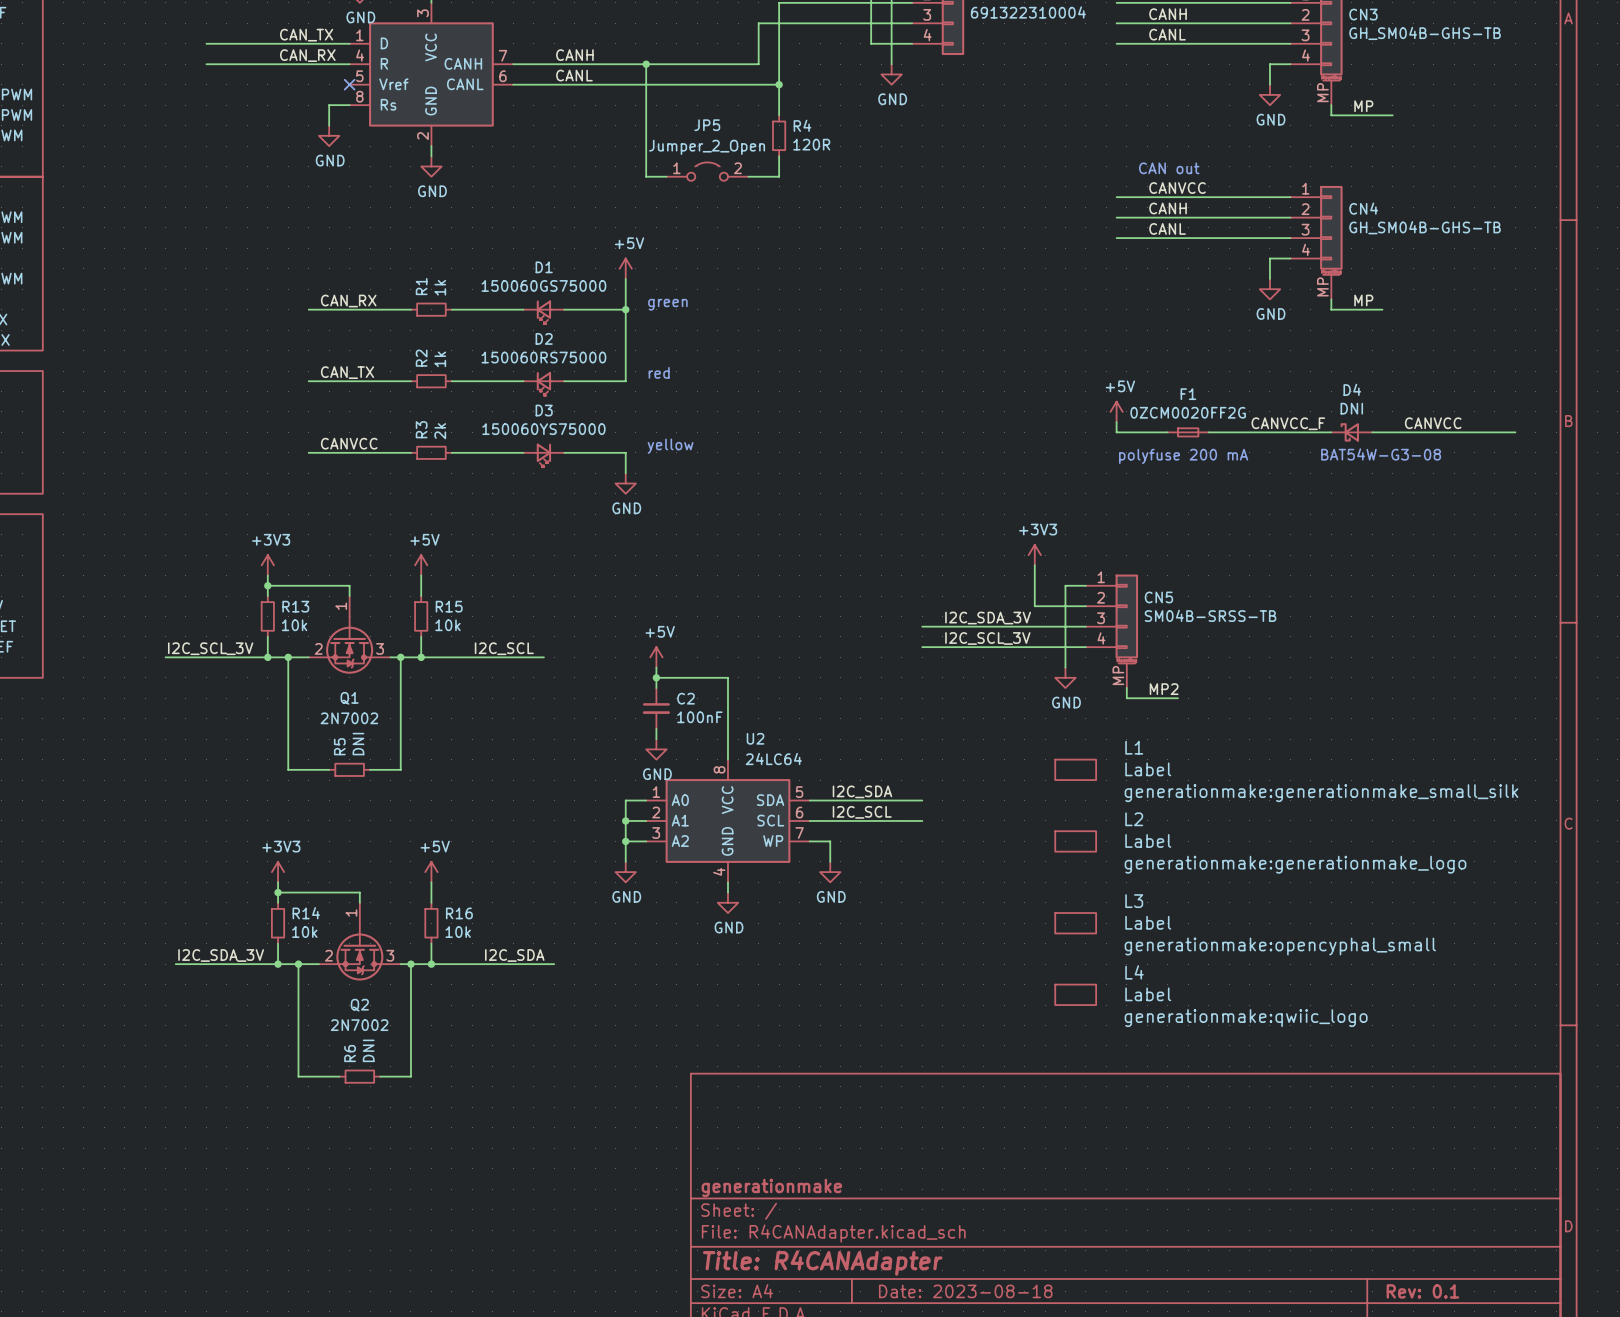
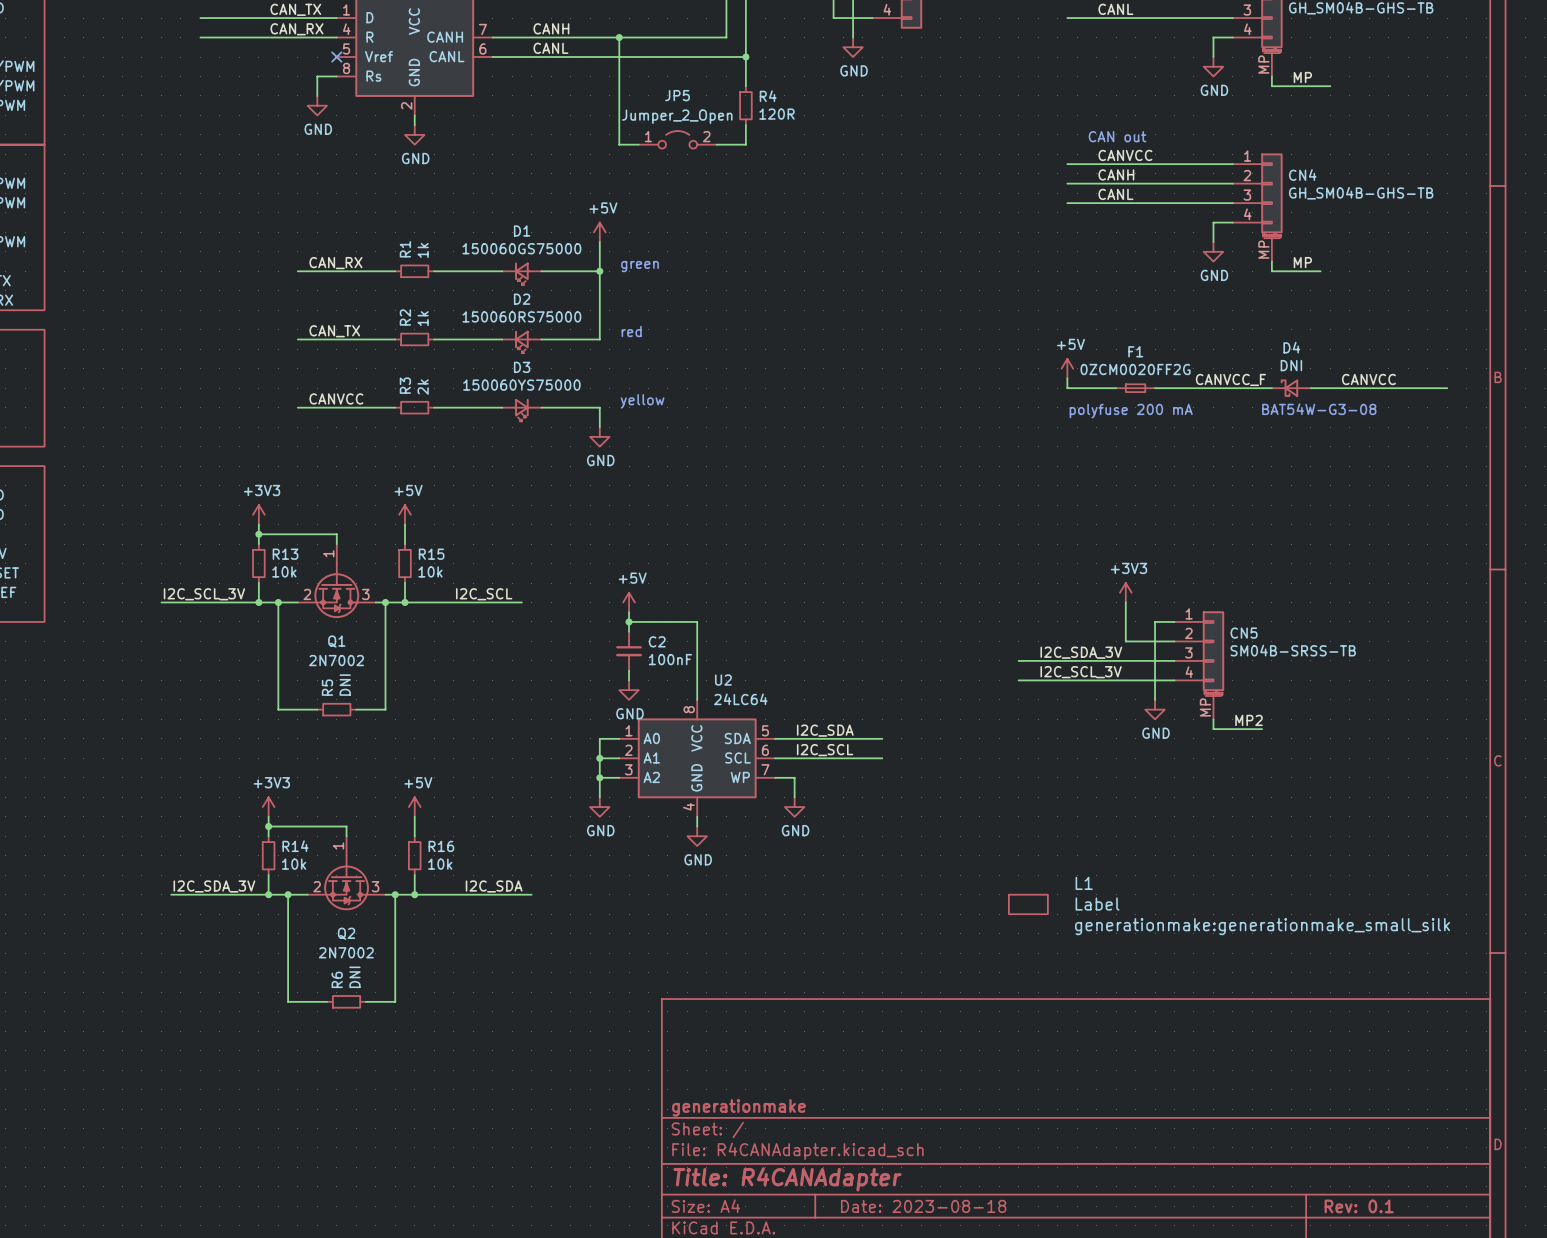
power symbol position: +3V3 (1034, 555) -> +3V3 (1125, 592)
wire: (1034, 565) (1034, 606) (1085, 606) -> (1125, 602) (1125, 641) (1174, 641)
wire: (1085, 585) (1065, 585) (1065, 667) -> (1174, 621) (1155, 621) (1155, 699)
label position: I2C_SDA_3V (988, 618) -> I2C_SDA_3V (1081, 652)
wire: (922, 626) (1085, 626) -> (1018, 660) (1174, 660)
CN5 position: (1111, 631) -> (1199, 665)
label position: I2C_SCL_3V (987, 638) -> I2C_SCL_3V (1081, 672)
wire: (922, 647) (1085, 647) -> (1018, 680) (1174, 680)
power symbol position: GND (1065, 677) -> GND (1155, 709)
wire: (1126, 688) (1126, 698) (1177, 698) -> (1213, 719) (1213, 729) (1262, 729)
label position: MP2 (1164, 689) -> MP2 (1249, 720)
L1 position: (1075, 769) -> (1028, 904)
L2: Label (1075, 841) -> none
L3: Label (1075, 923) -> none
L4: Label (1075, 994) -> none

